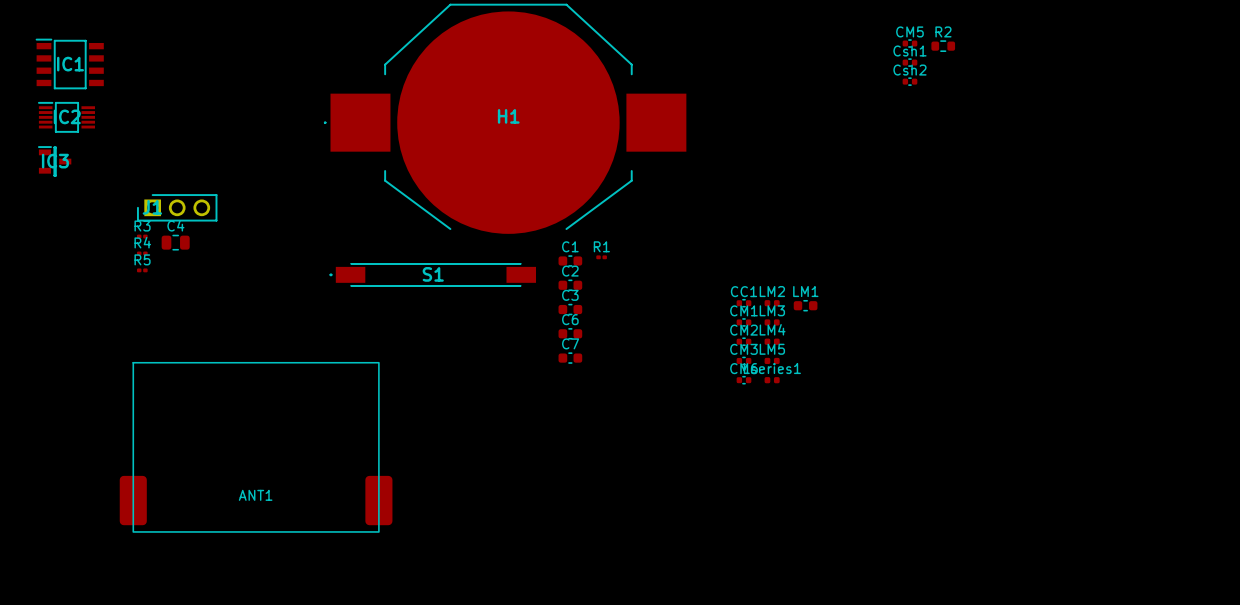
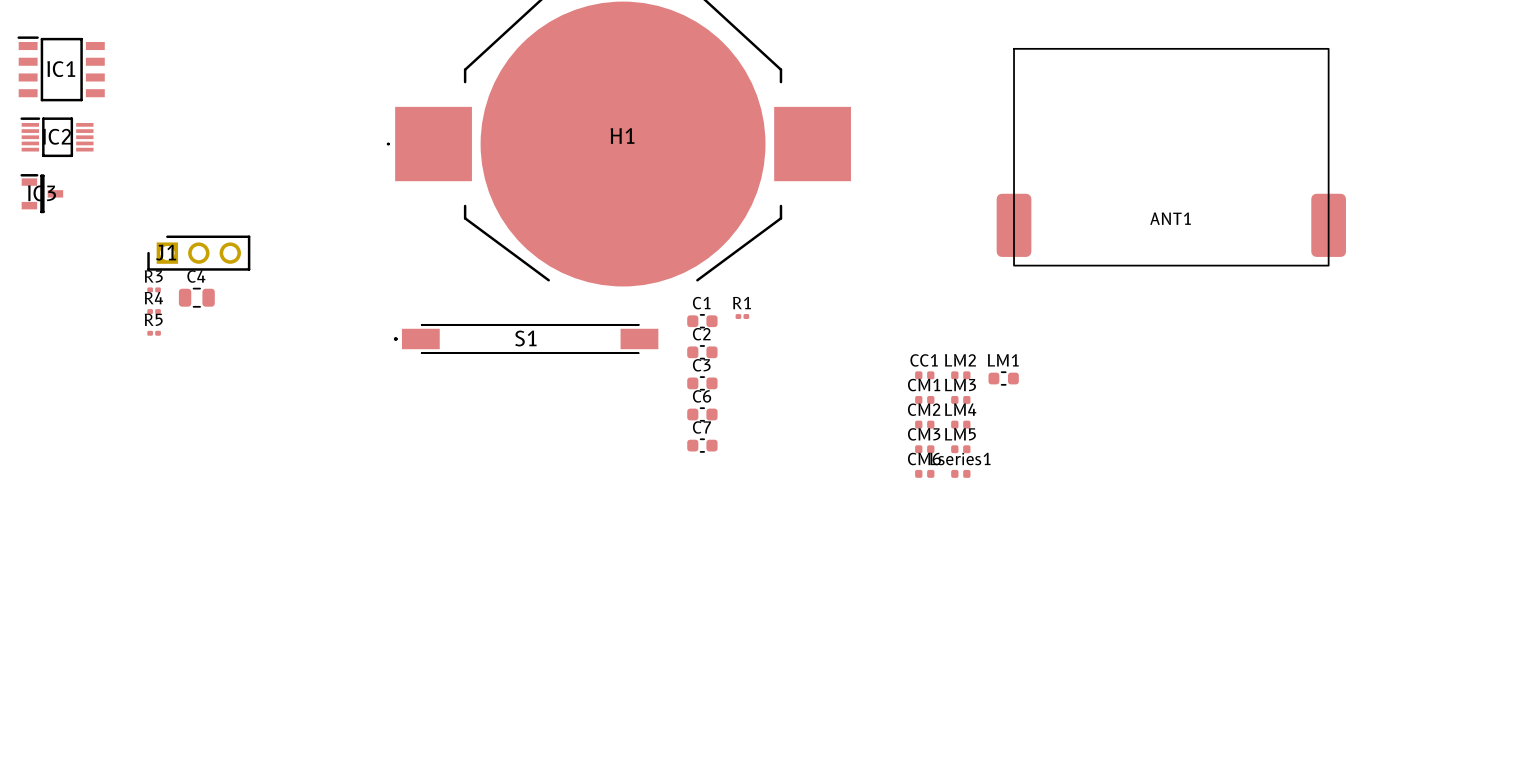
CM5: (909, 43) -> none
R2: (943, 46) -> none
Csh1: (909, 62) -> none
Csh2: (909, 81) -> none
CC1 footprint: [736, 299, 752, 308] -> [915, 371, 935, 380]
CM1 footprint: [736, 318, 752, 327] -> [915, 395, 935, 404]
CM2 footprint: [736, 337, 752, 346] -> [915, 420, 935, 429]
CM3 footprint: [736, 356, 752, 366] -> [915, 445, 935, 454]
CM6 footprint: [736, 376, 752, 385] -> [915, 469, 935, 478]
ANT1 position: (256, 447) -> (1171, 157)

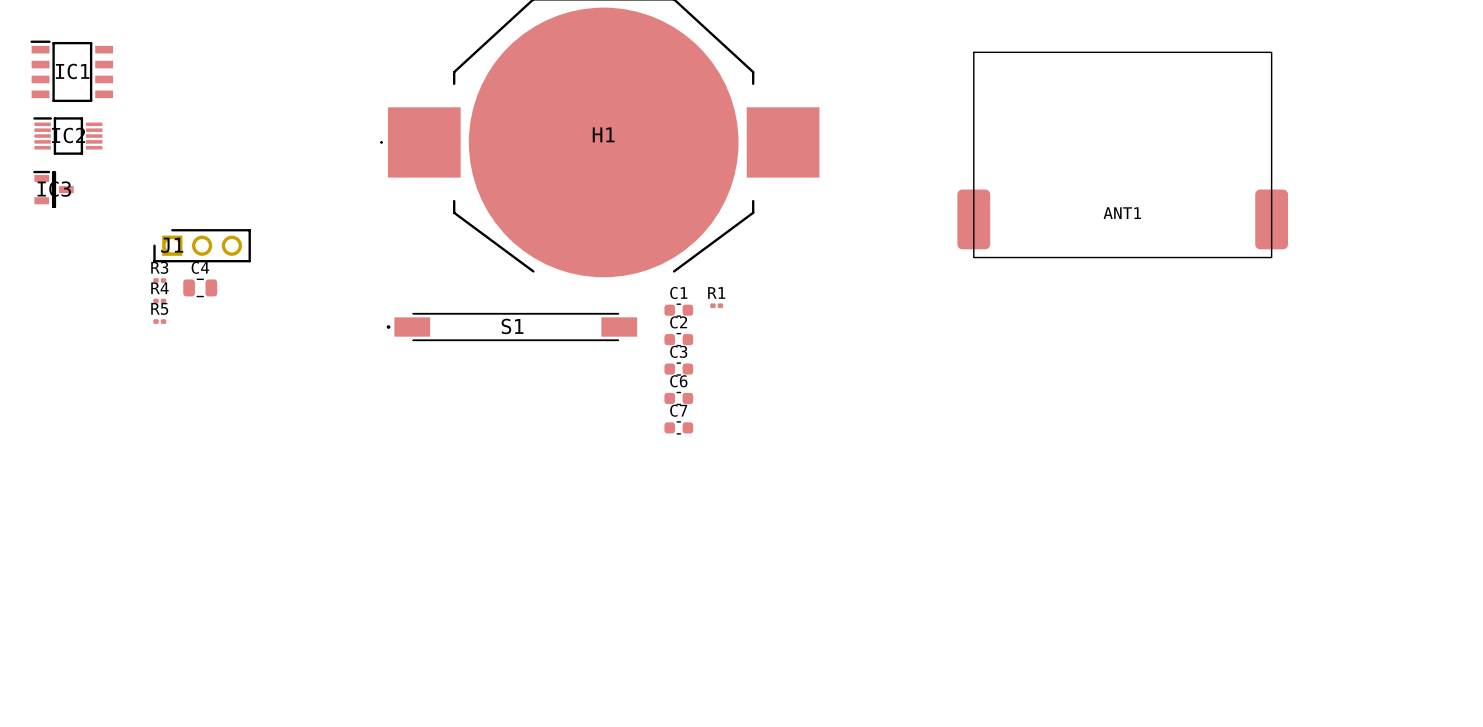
CC1: (924, 375) -> none
LM2: (960, 375) -> none
LM1: (1003, 378) -> none
CM1: (924, 399) -> none
LM3: (960, 399) -> none
CM2: (924, 424) -> none
LM4: (960, 424) -> none
CM3: (924, 449) -> none
LM5: (960, 449) -> none
CM6: (924, 473) -> none
Lseries1: (960, 473) -> none

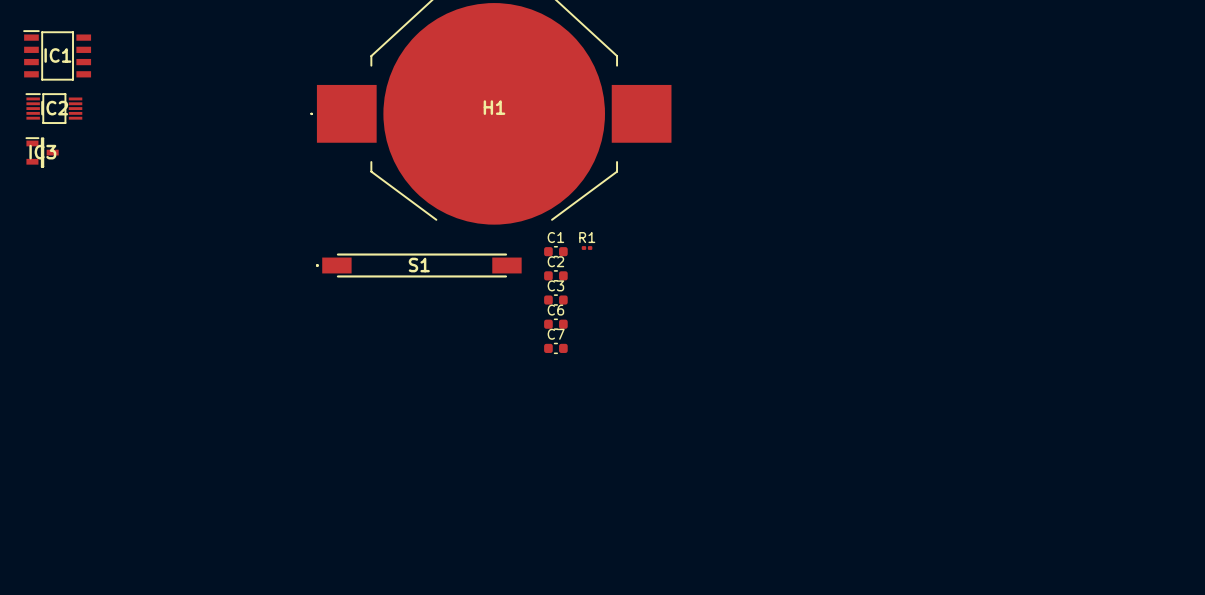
ANT1: (1122, 154) -> none
J1: (202, 245) -> none
R3: (159, 280) -> none
C4: (200, 287) -> none
R4: (159, 301) -> none
R5: (159, 321) -> none

